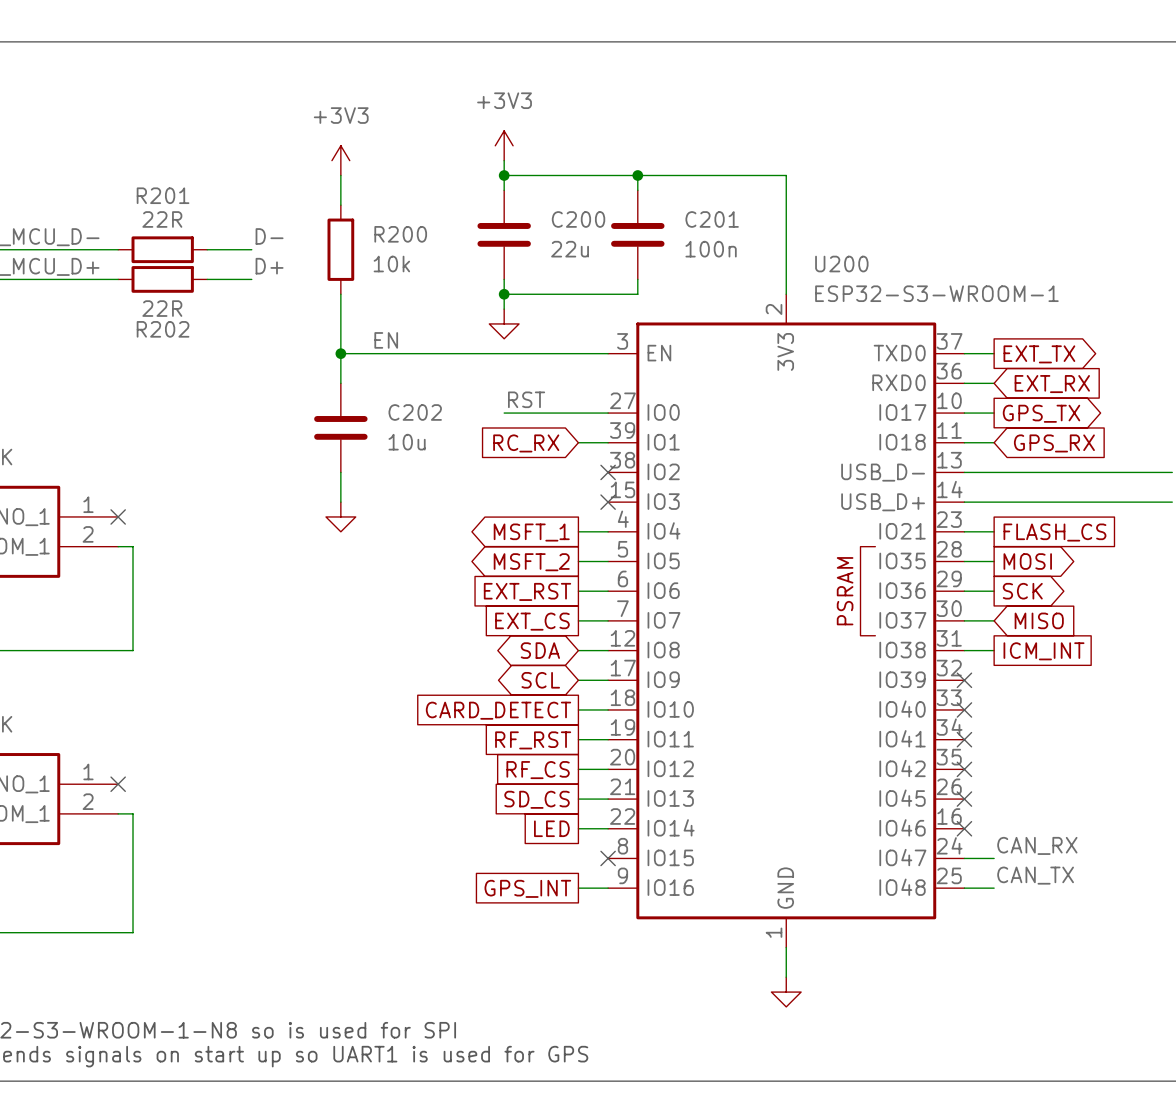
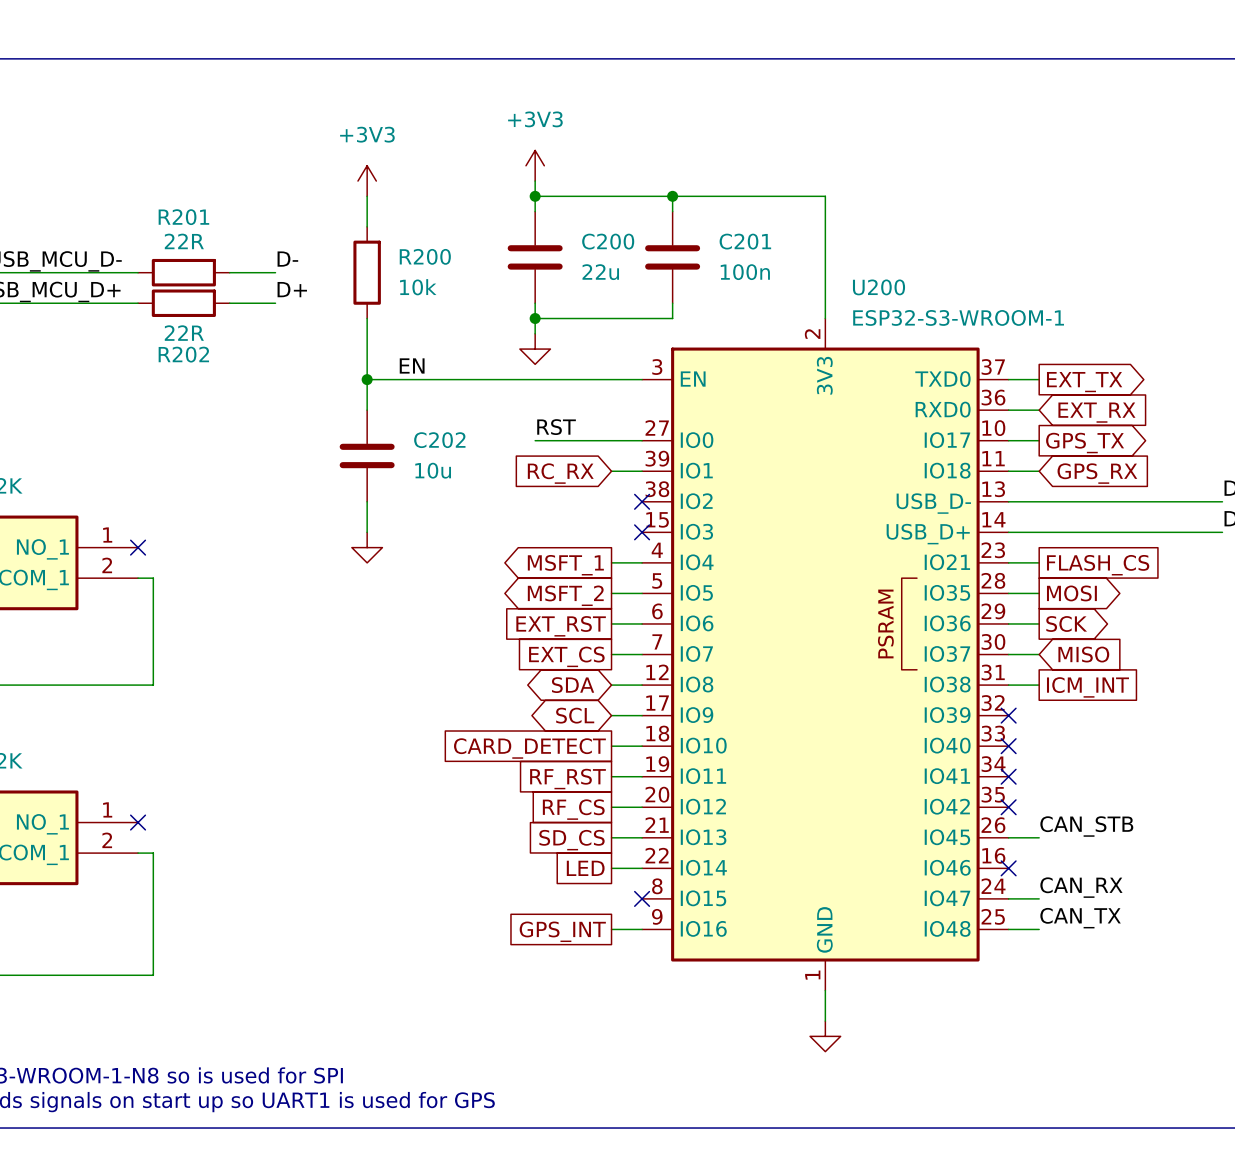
label: none -> CAN_STB (1086, 826)
wire: none -> (1008, 837) (1039, 837)
no-connect mark: (964, 799) -> none

